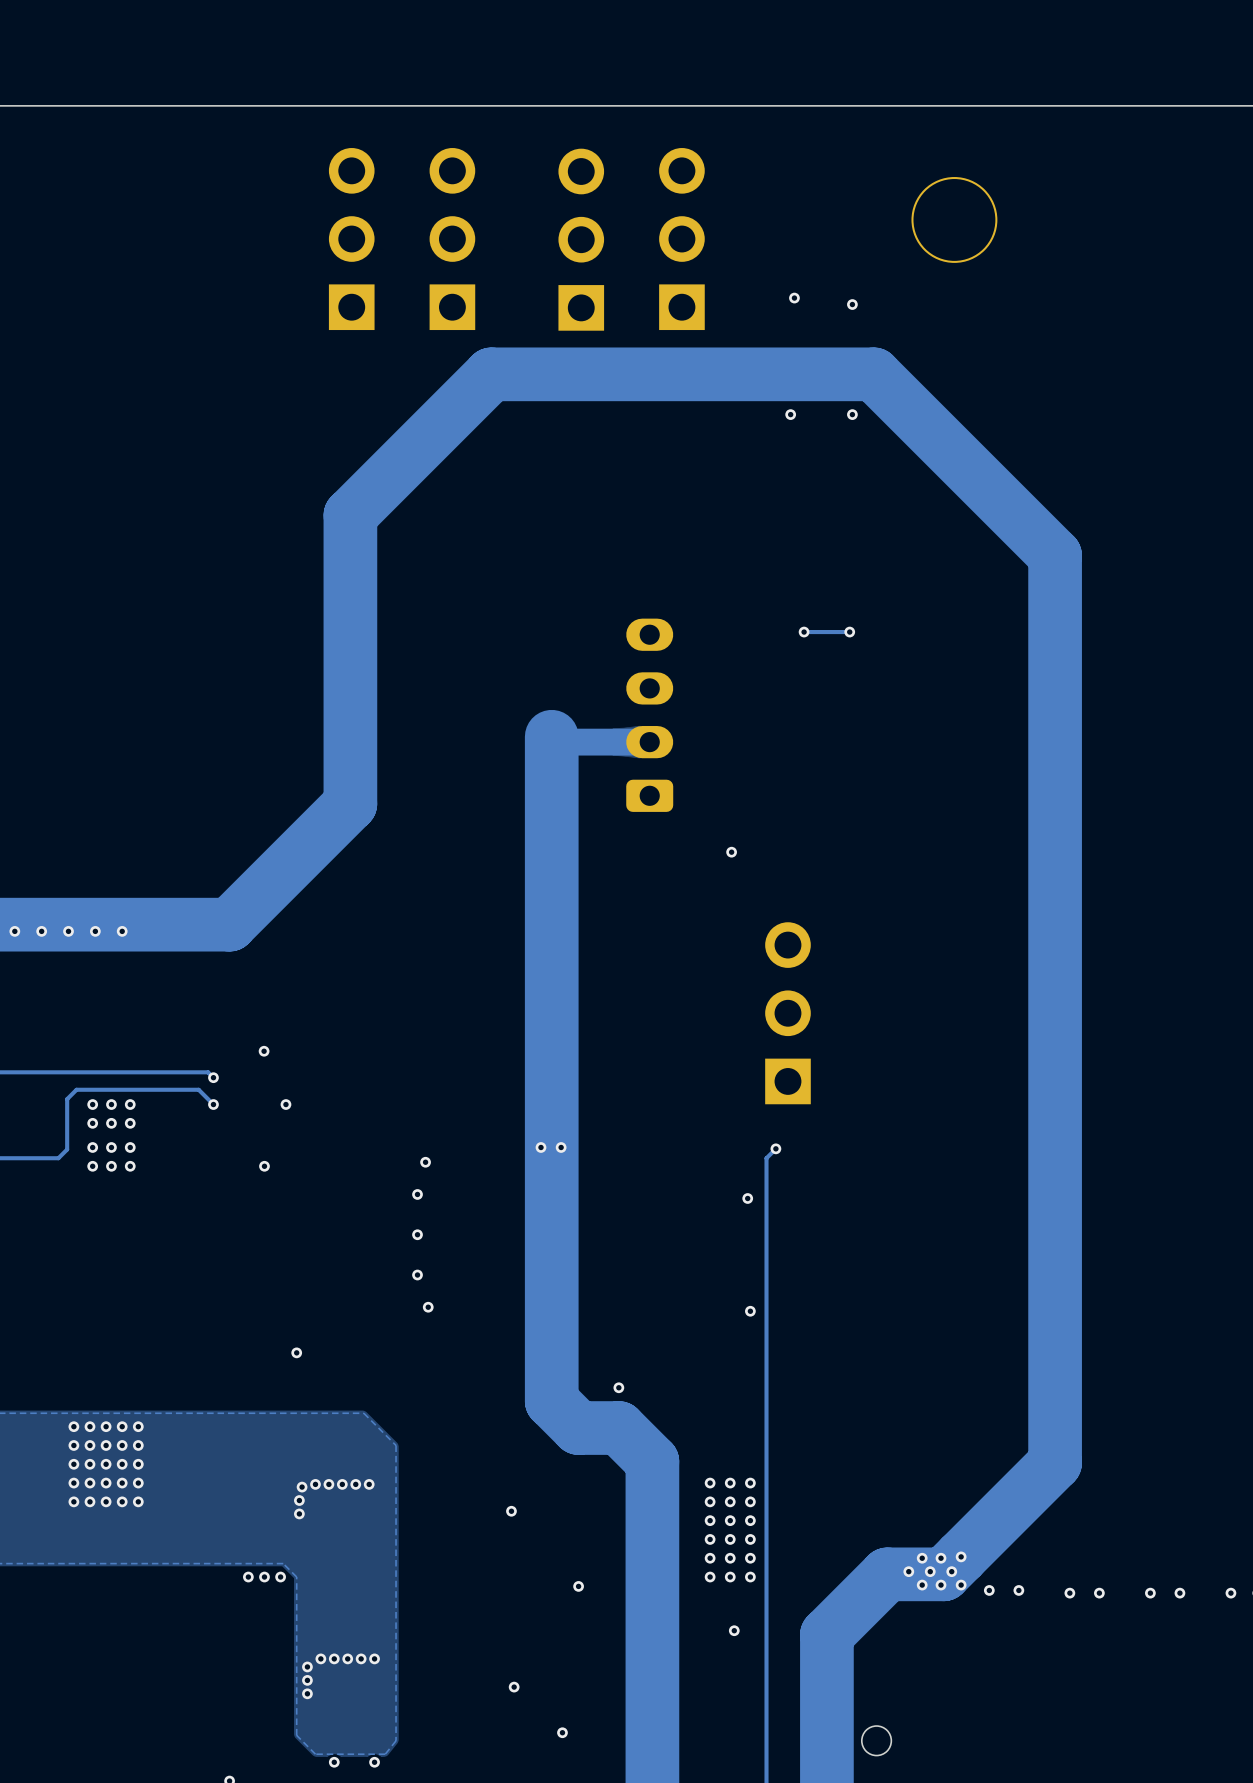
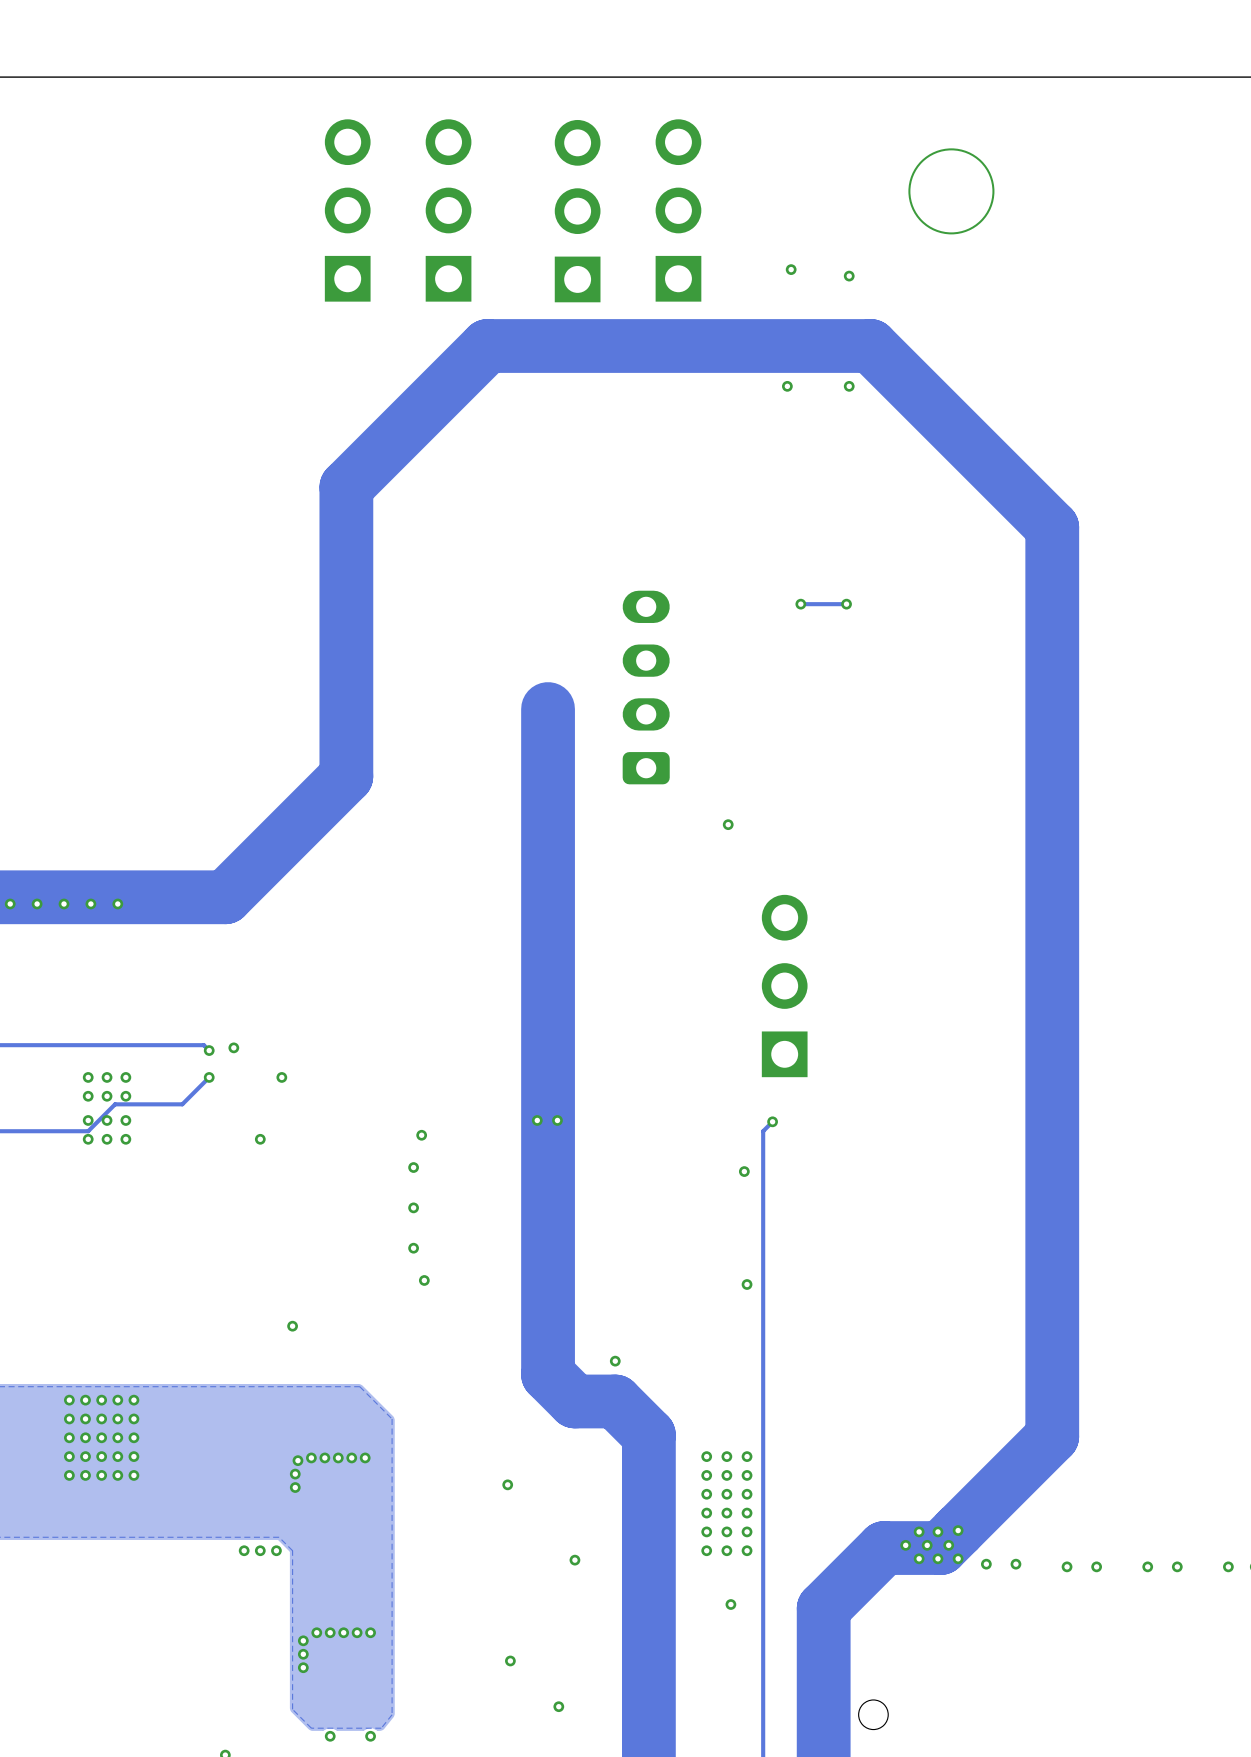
track: (649, 742) (557, 742) -> none
via position: (264, 1051) -> (233, 1047)
track: (213, 1104) (198, 1089) (76, 1089) (67, 1099) (67, 1149) (58, 1158) -> (209, 1077) (182, 1104) (115, 1104) (88, 1131) (53, 1131)

